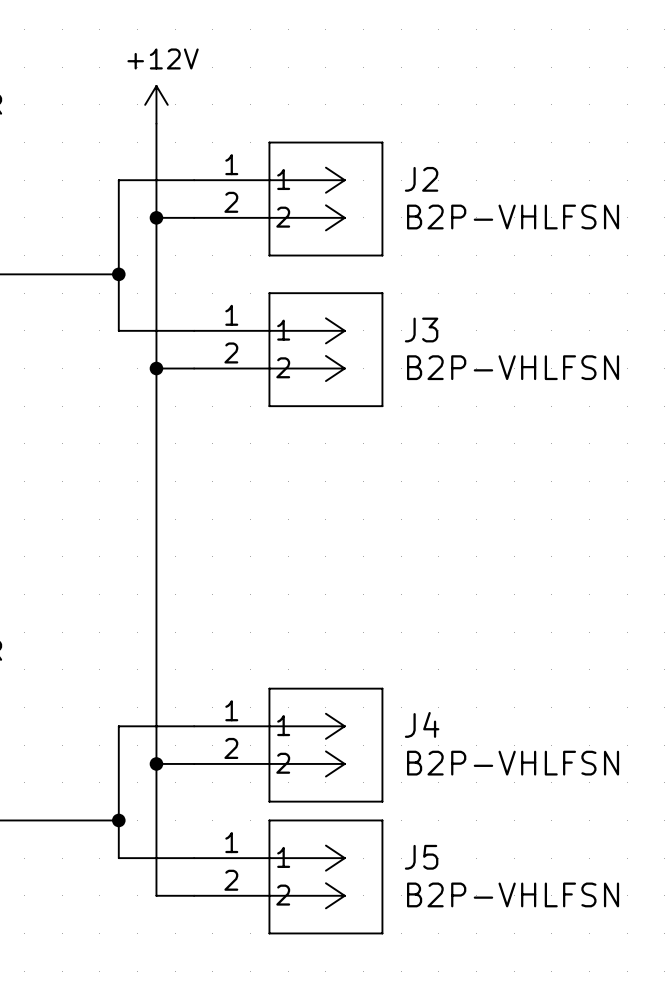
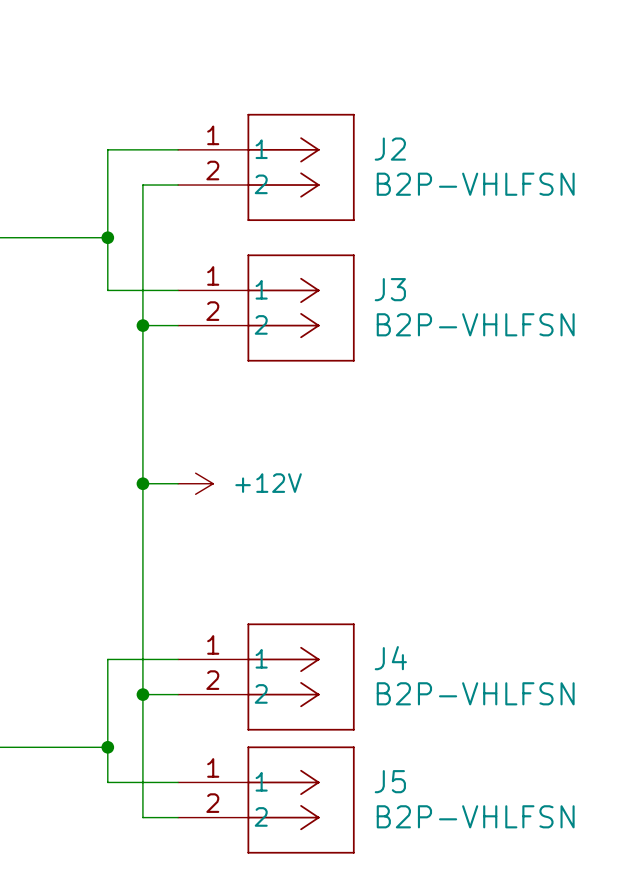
power symbol: +12V (156, 104) -> none
wire: (156, 123) (156, 217) -> none
junction: (156, 217) -> none
wire: none -> (142, 483) (178, 483)
junction: none -> (142, 483)
power symbol: none -> +12V (195, 483)

